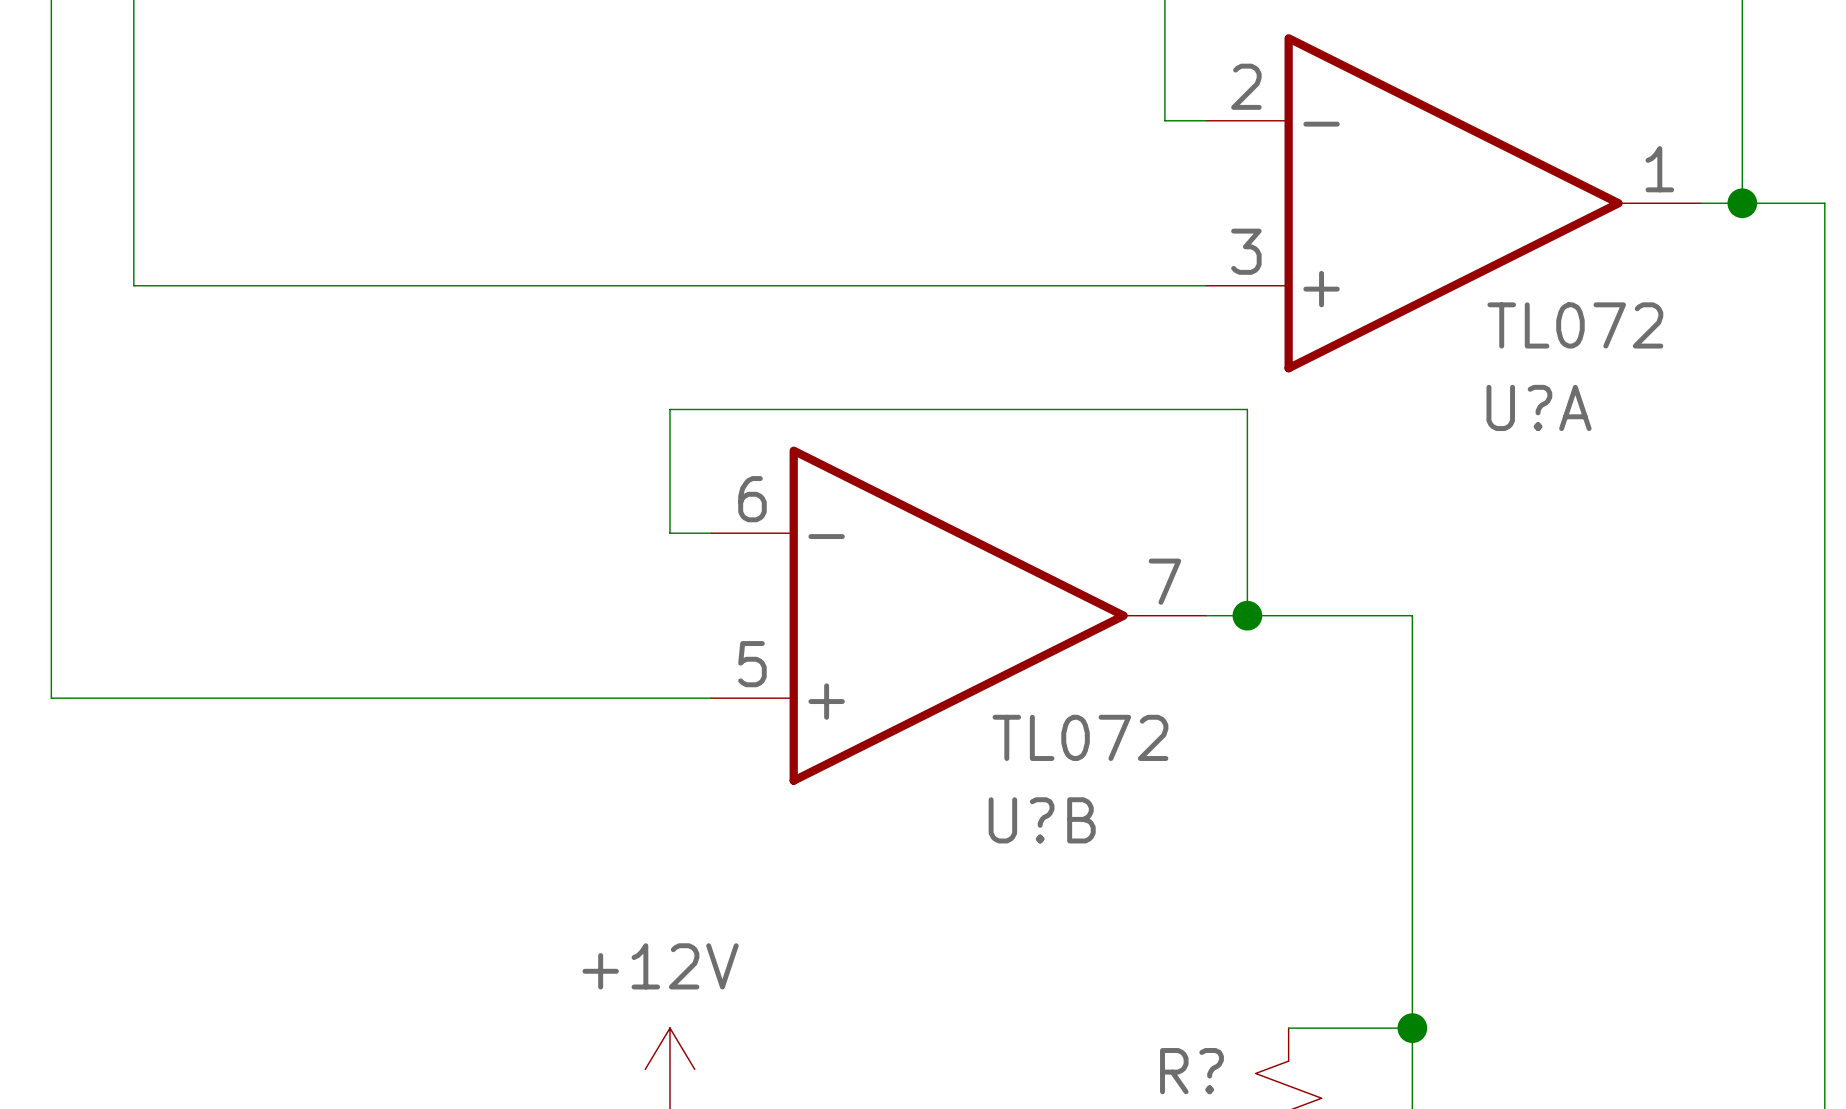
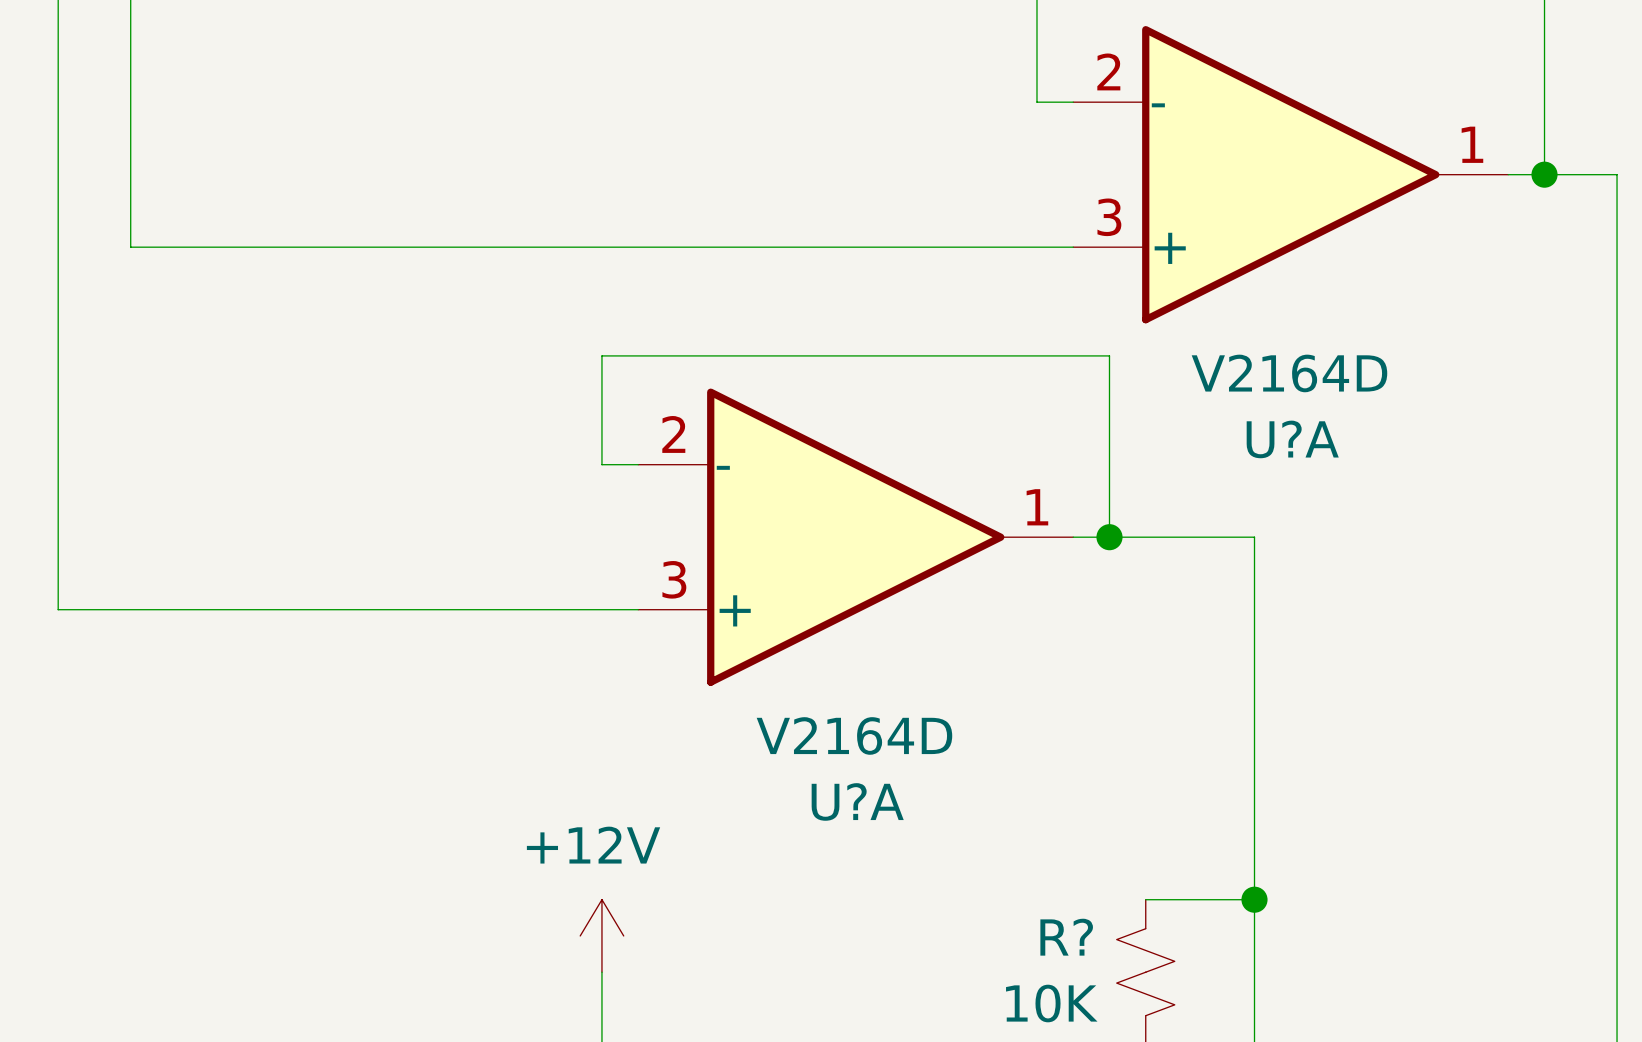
U?A value: TL072 (1575, 325) -> V2164D (1289, 373)
U?A name position: U?A (1539, 407) -> U?A (1292, 439)
U?B pin number: 6 (752, 499) -> 2 (673, 434)
U?B pin number: 7 (1164, 581) -> 1 (1037, 507)
U?B pin number: 5 (752, 664) -> 3 (674, 579)
U?B value: TL072 (1080, 737) -> V2164D (854, 735)
U?B name: U?B (1042, 820) -> U?A (857, 801)

